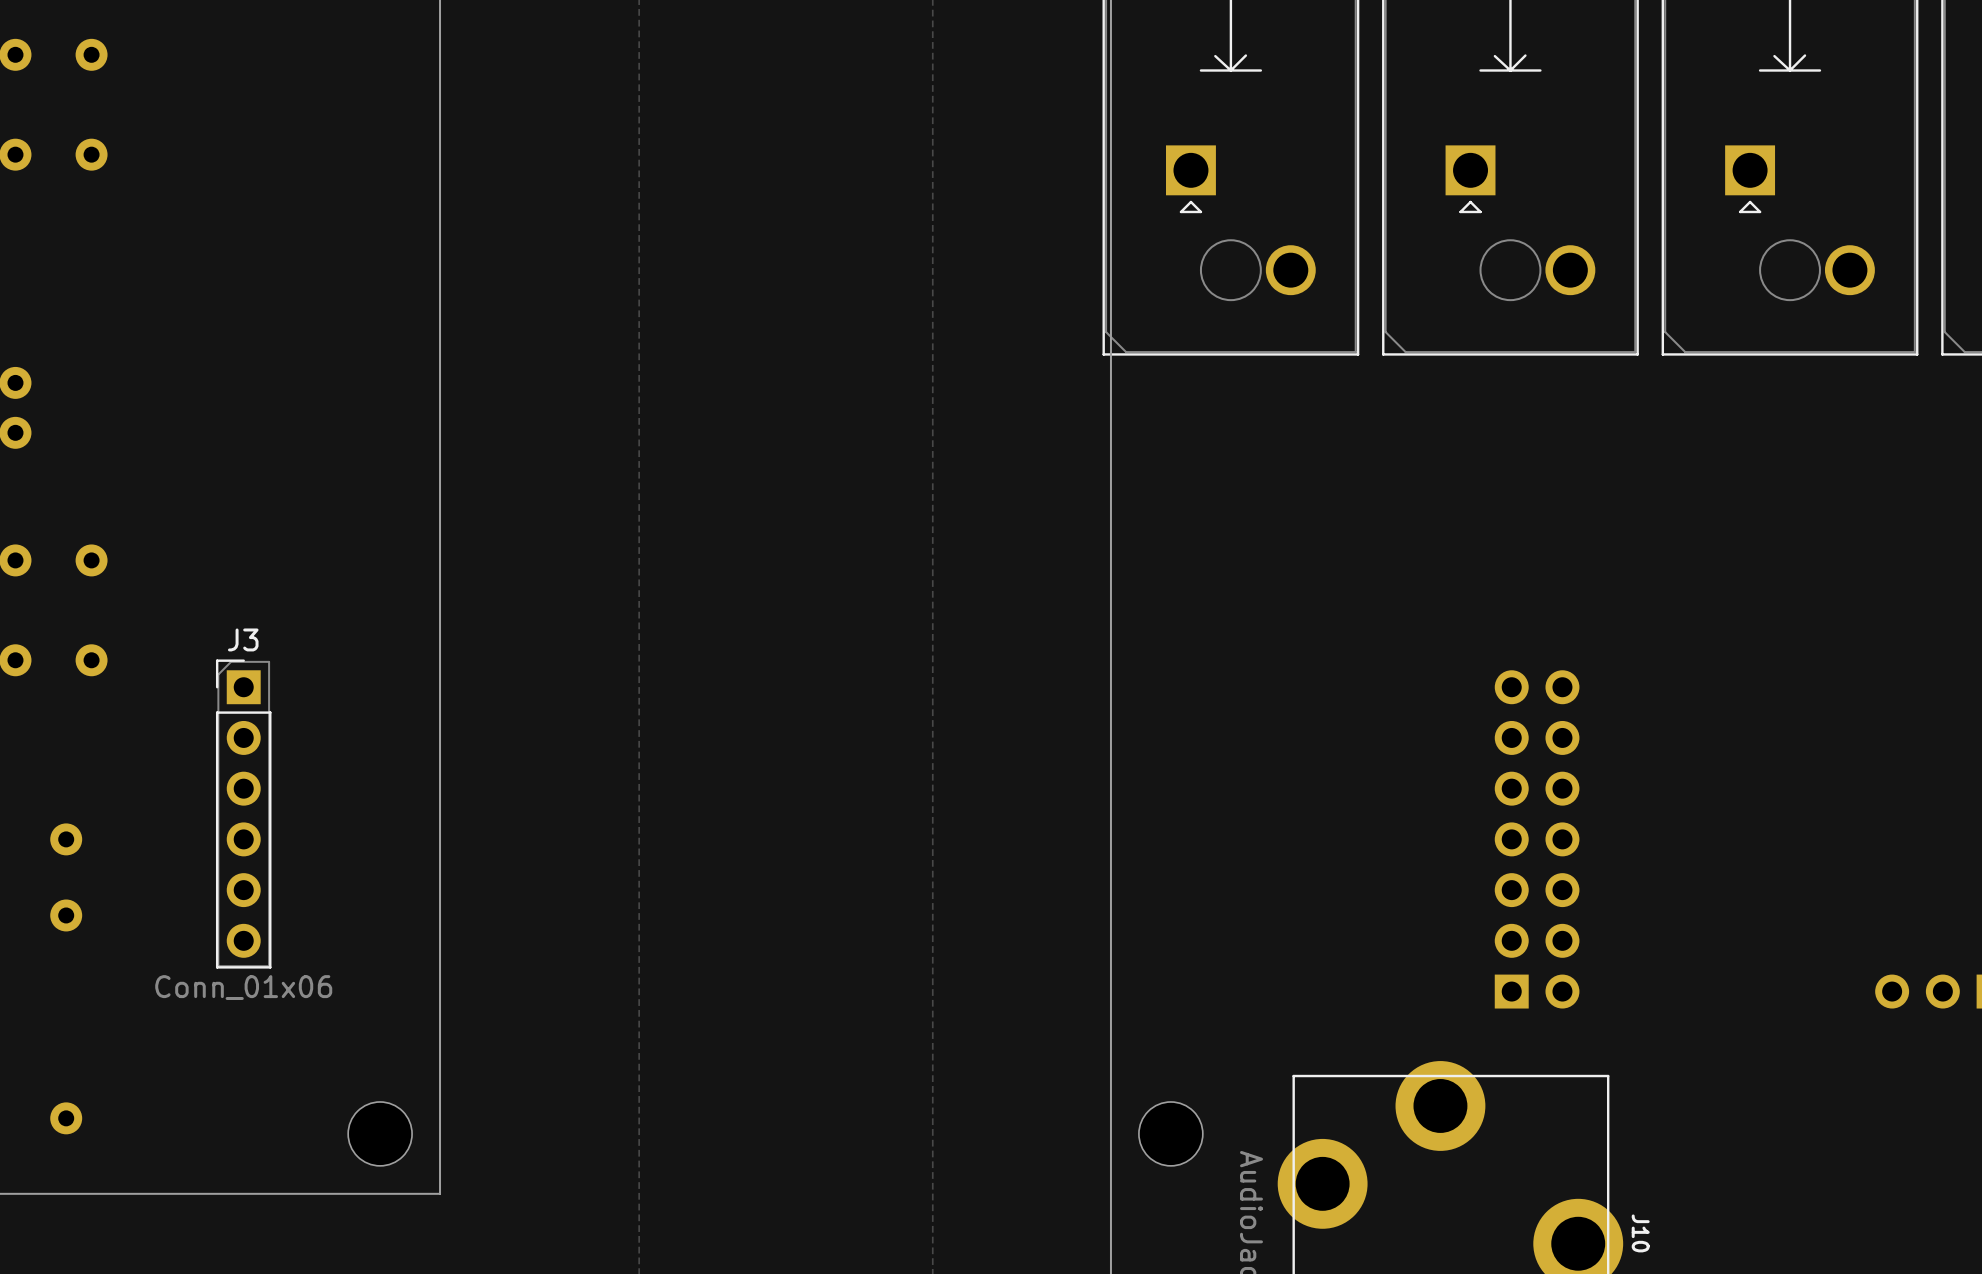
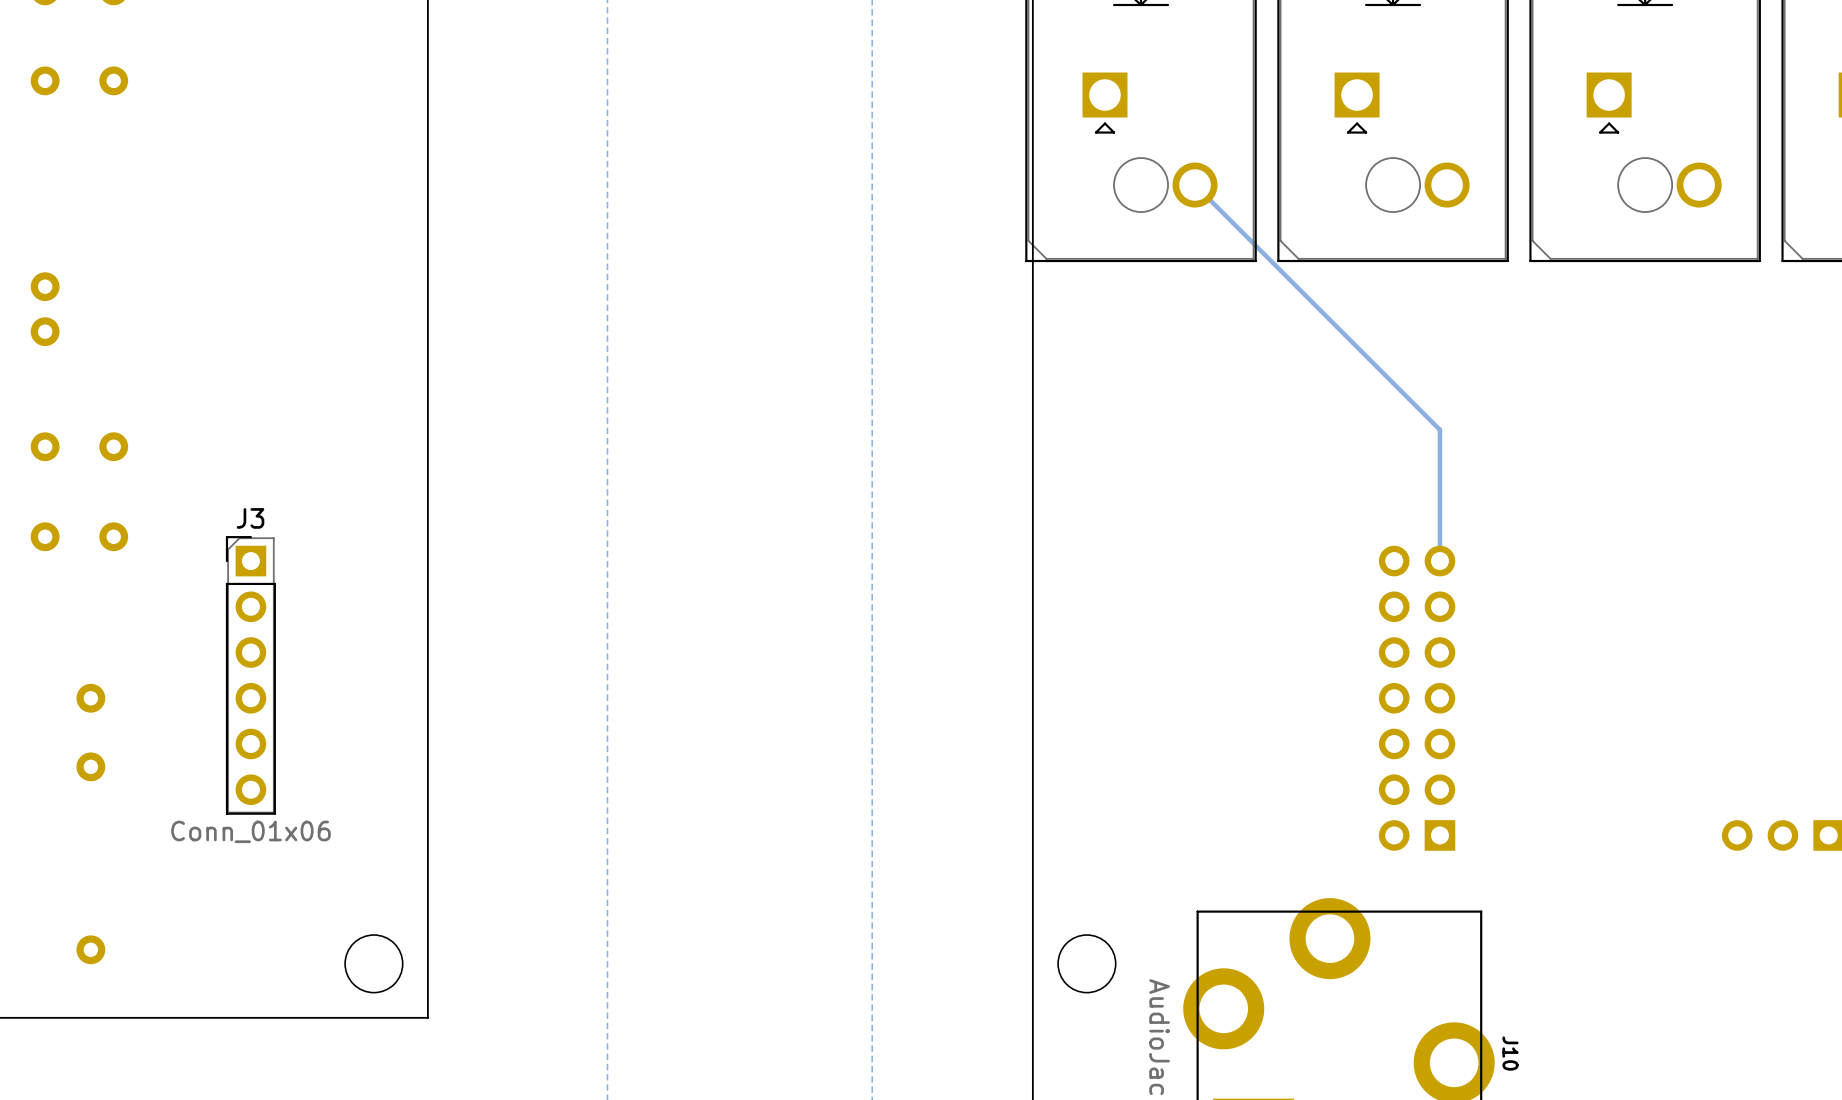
track: none -> (1195, 185) (1439, 429) (1439, 561)
part footprint: [1494, 670, 1580, 1009] -> [1378, 545, 1456, 851]

